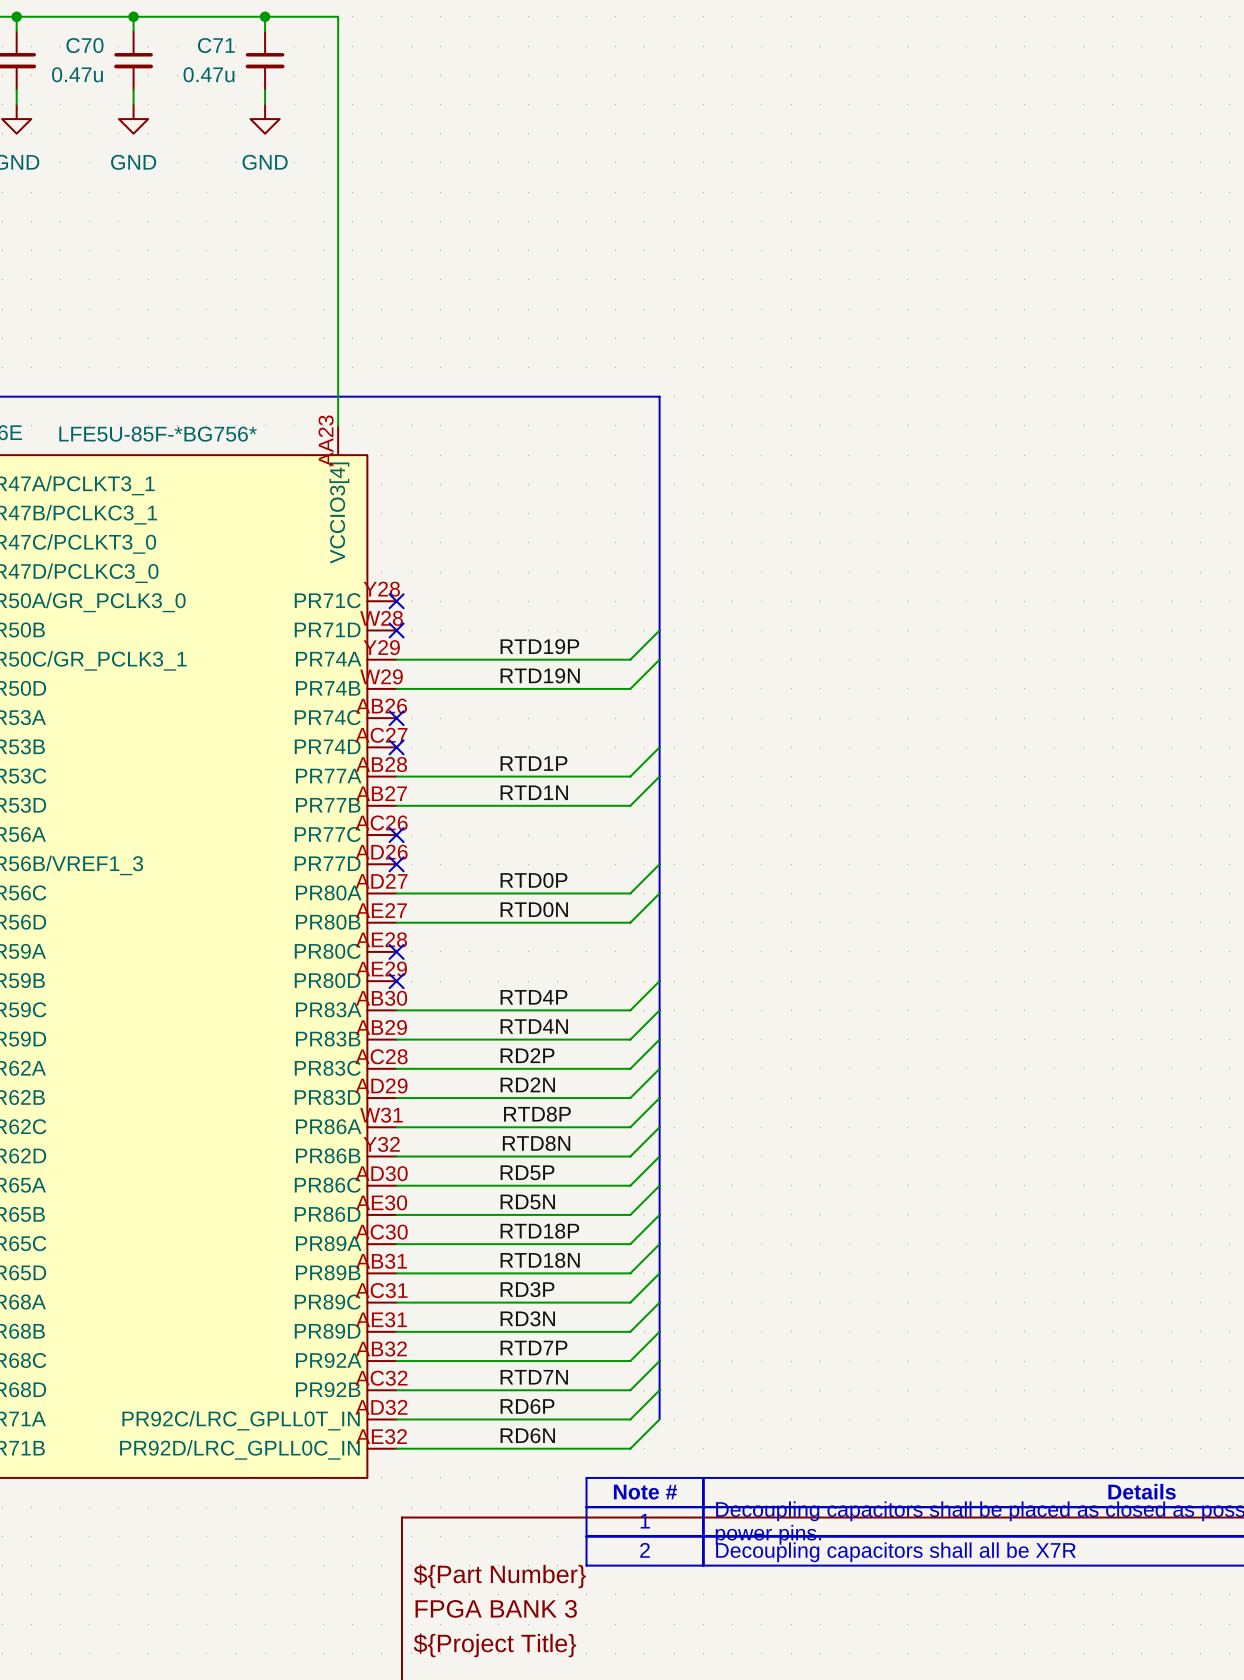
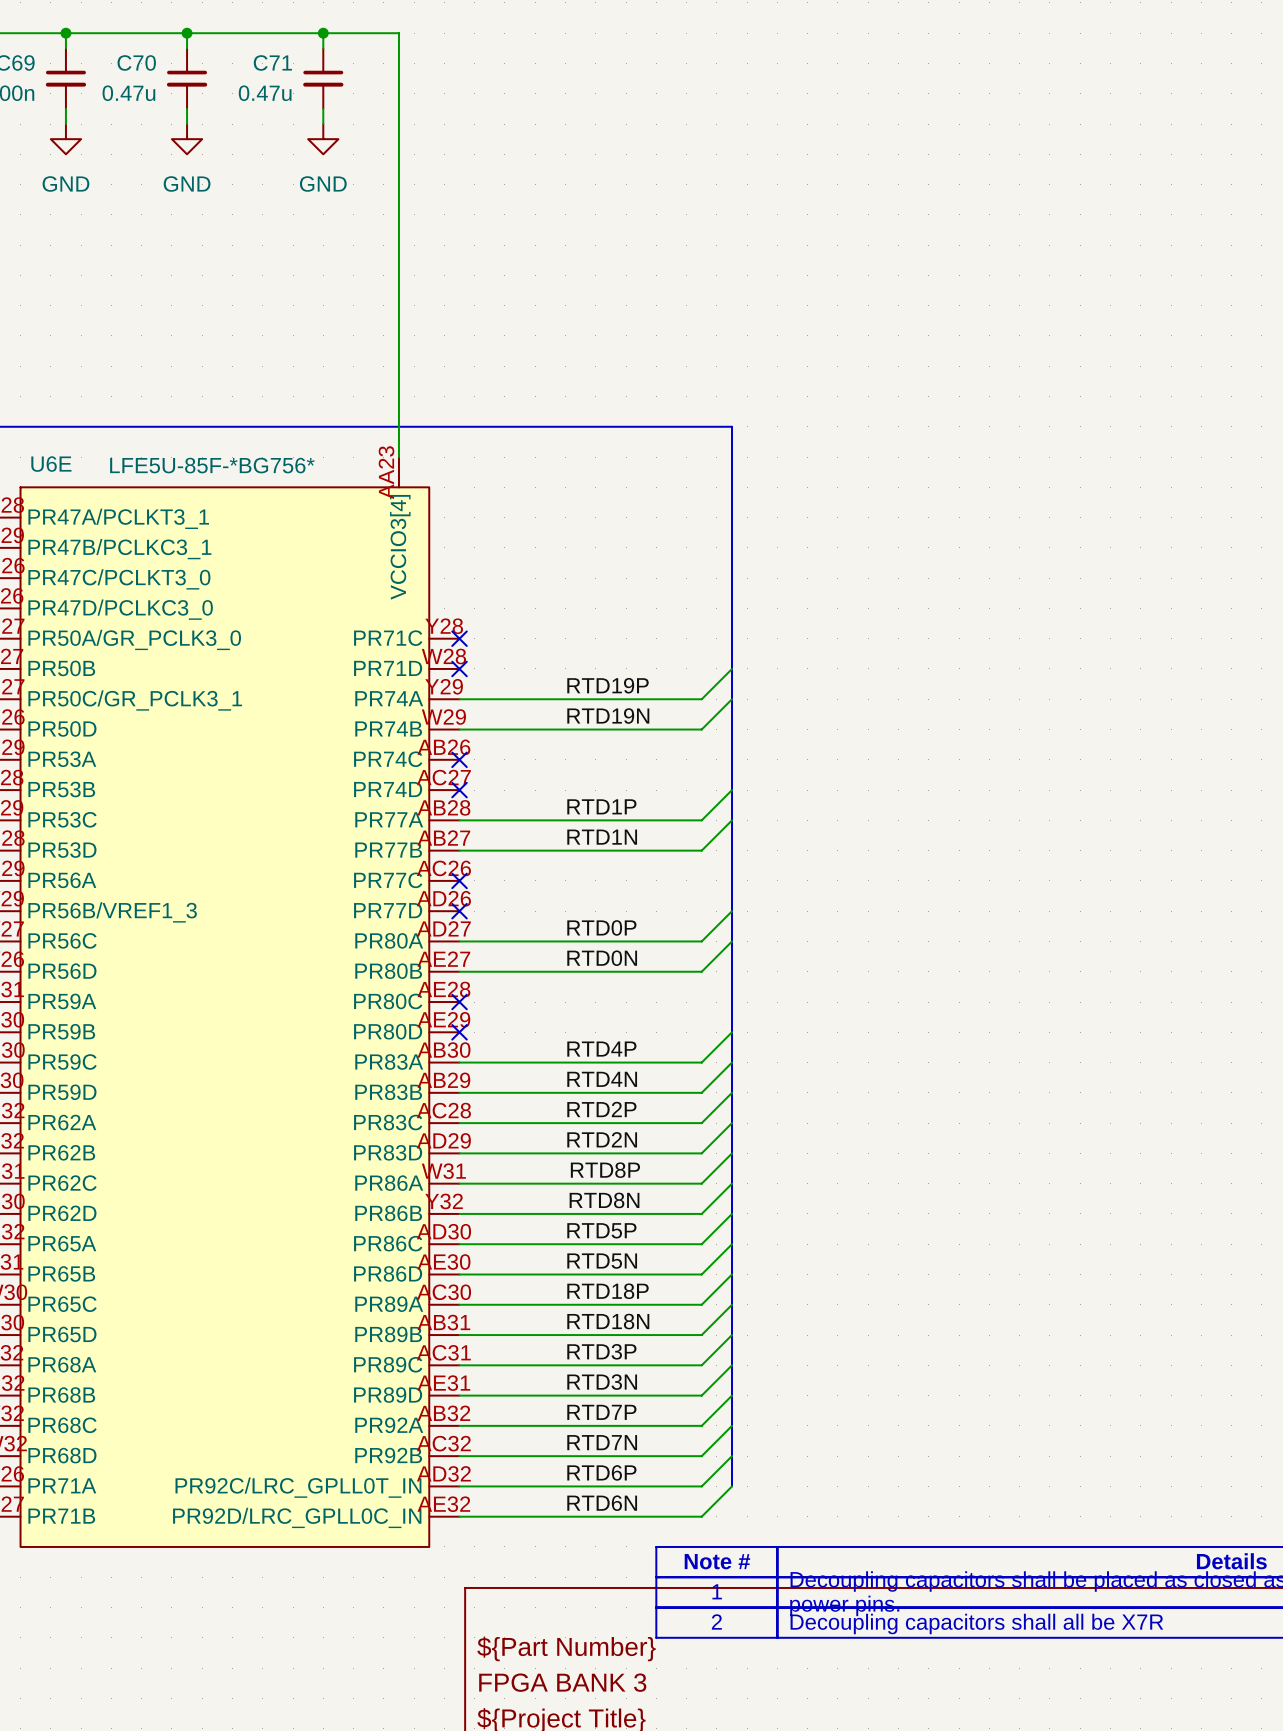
label: RD2P (527, 1055) -> RTD2P (601, 1109)
label: RD2N (527, 1084) -> RTD2N (602, 1139)
label: RD5P (527, 1172) -> RTD5P (601, 1230)
label: RD5N (527, 1202) -> RTD5N (602, 1261)
label: RD3P (527, 1289) -> RTD3P (601, 1351)
label: RD3N (527, 1318) -> RTD3N (602, 1382)
label: RD6P (527, 1406) -> RTD6P (601, 1472)
label: RD6N (527, 1435) -> RTD6N (602, 1503)

